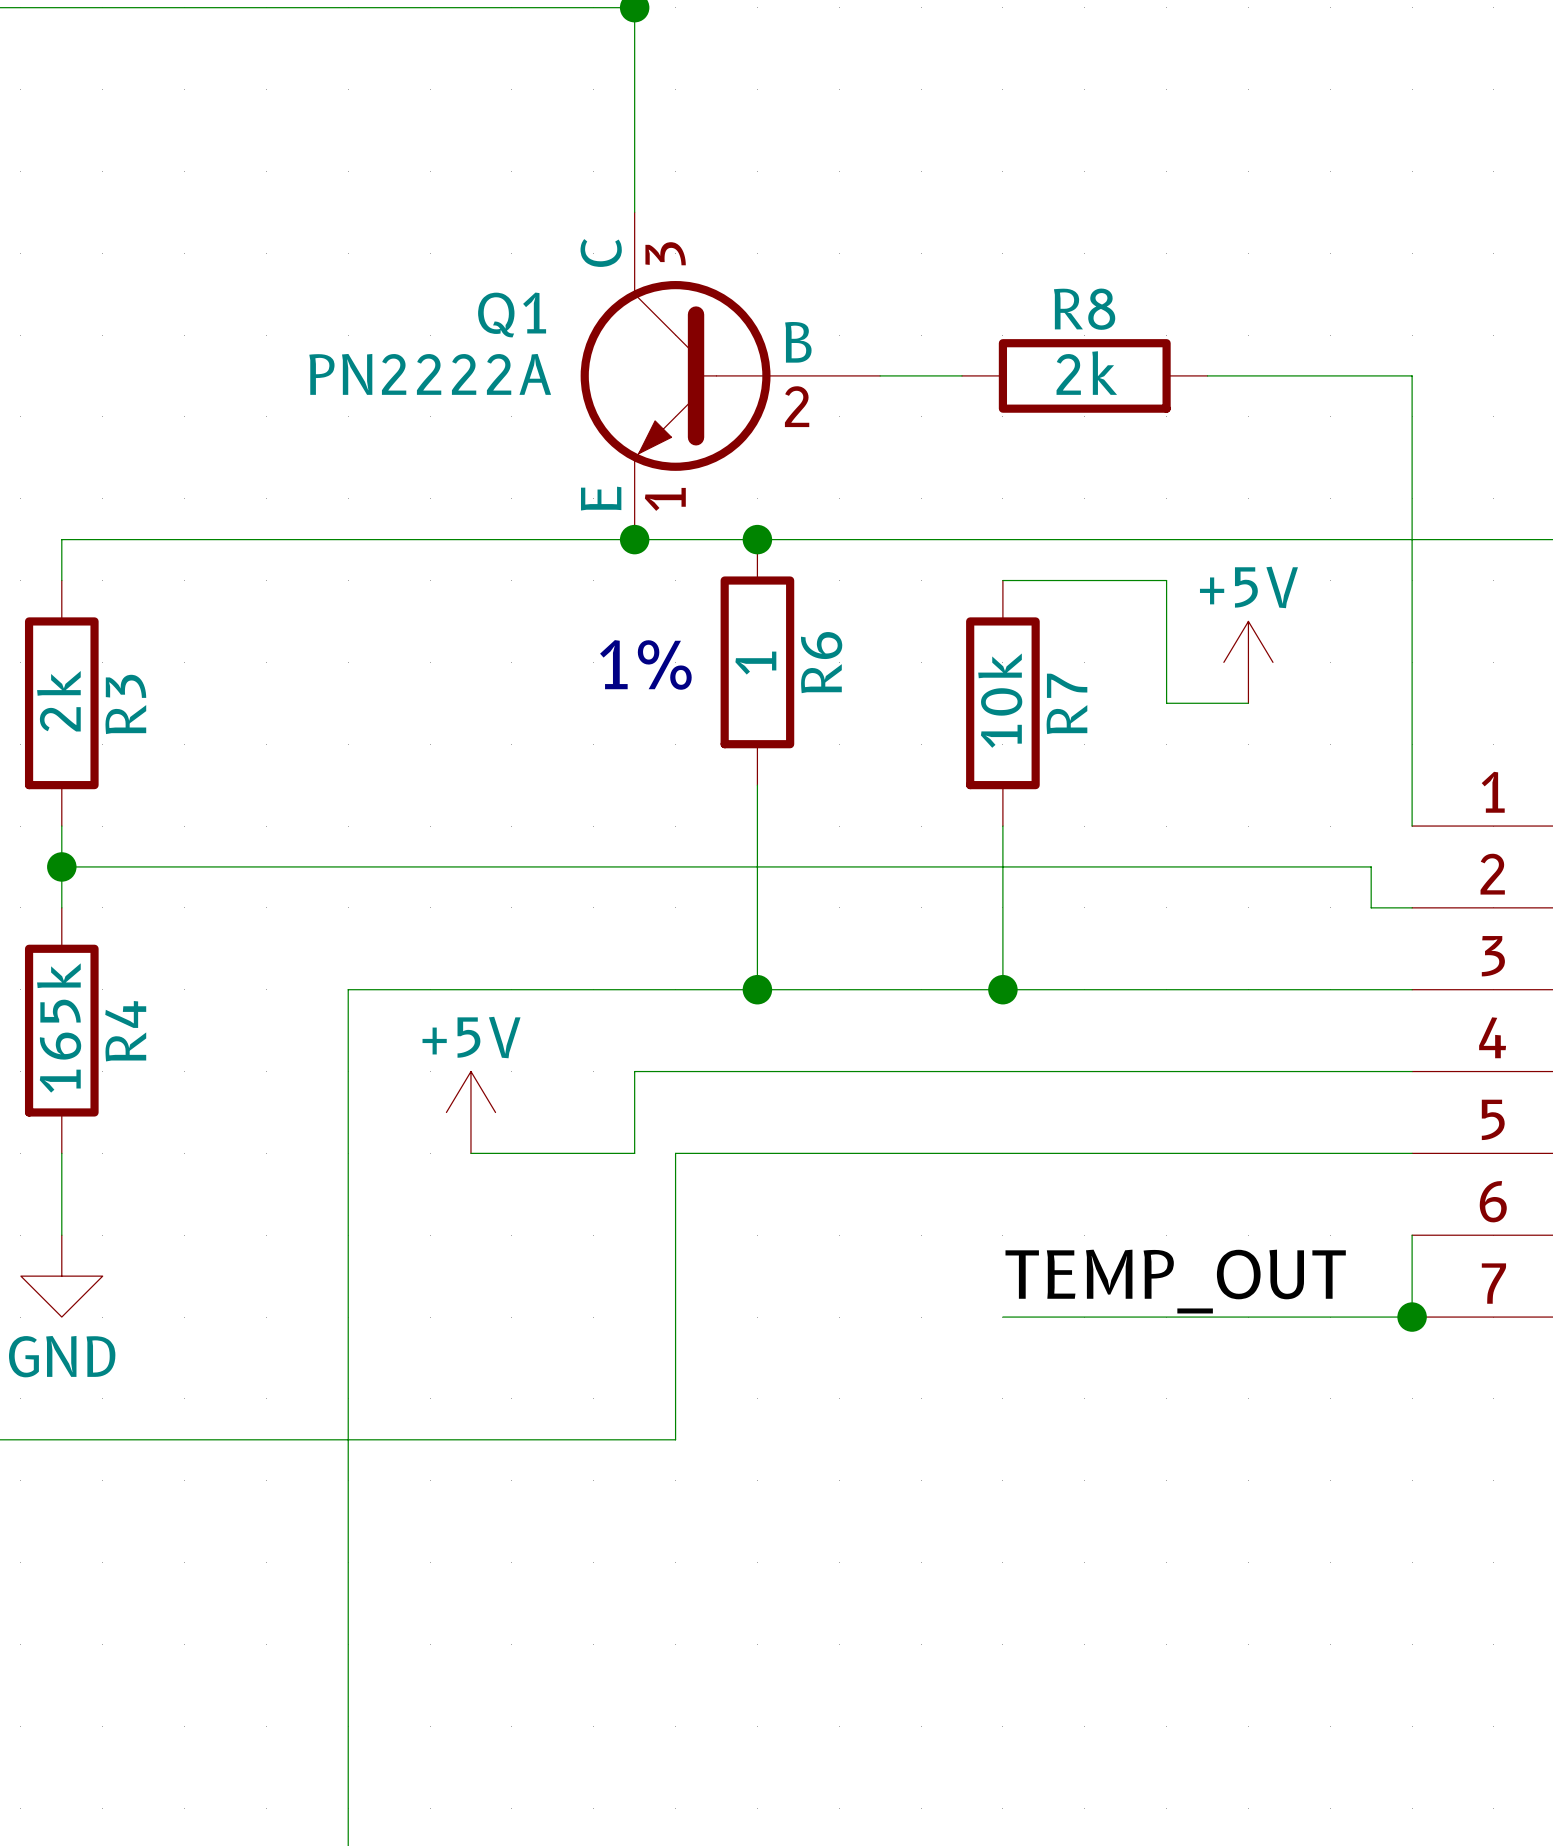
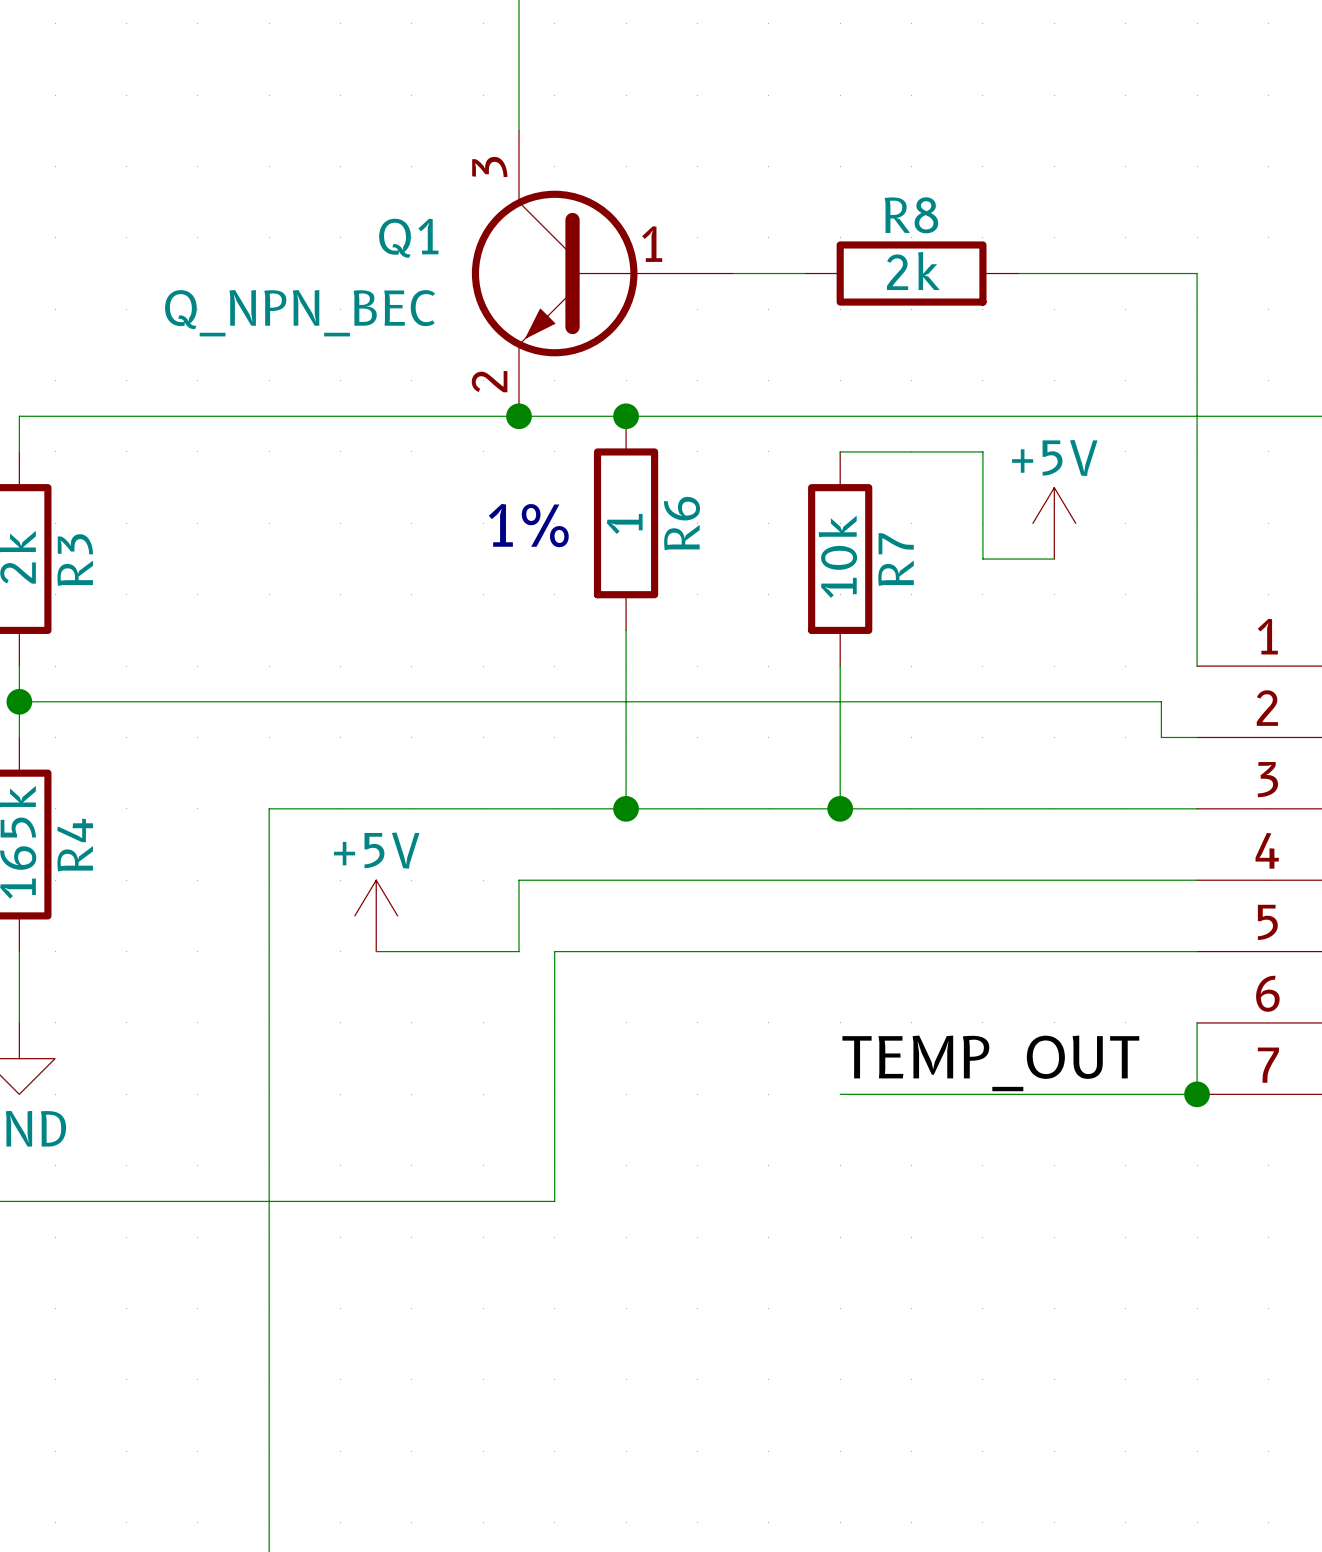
Q1 symbol: [580, 212, 881, 540] -> [471, 130, 734, 417]
Q1 value: PN2222A (430, 374) -> Q_NPN_BEC (300, 313)

